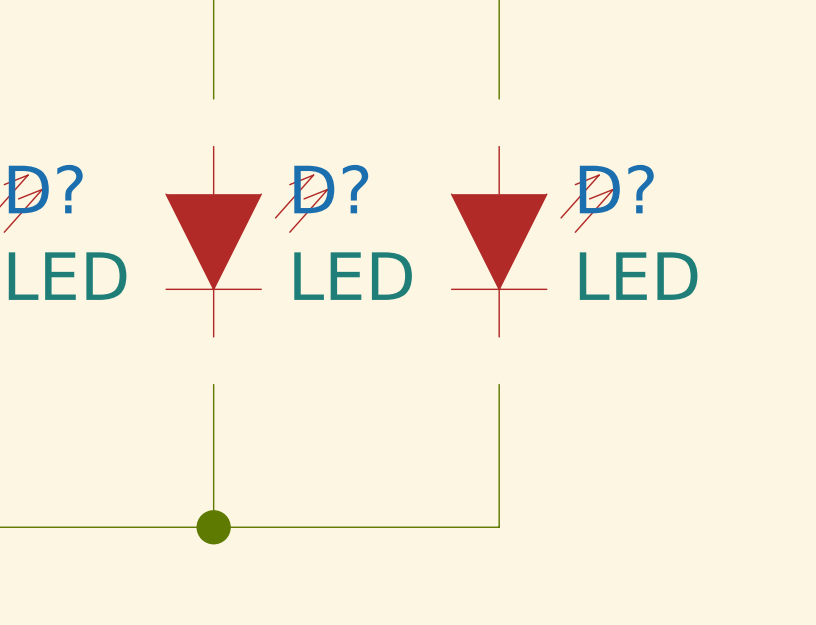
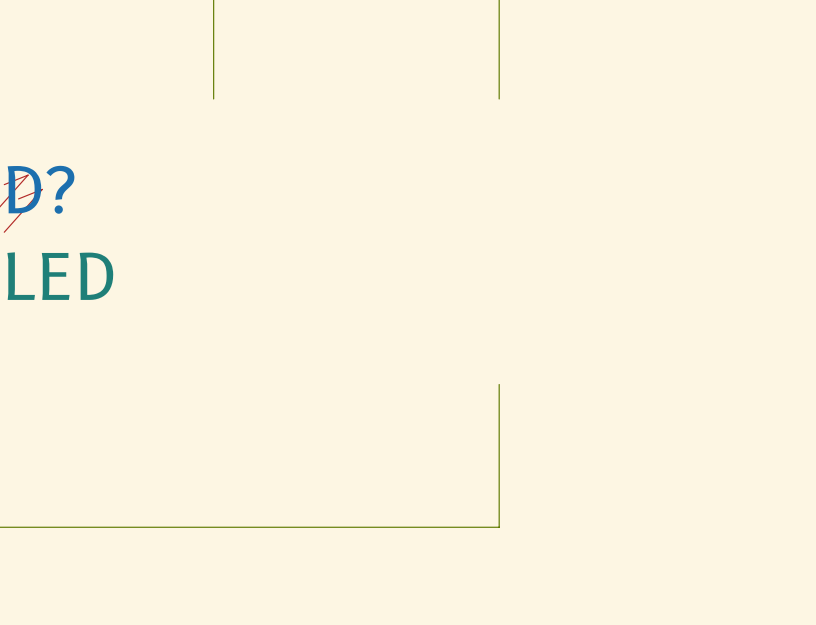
D?: LED (246, 241) -> none
D?: LED (532, 241) -> none
wire: (213, 384) (213, 527) -> none
junction: (213, 527) -> none

